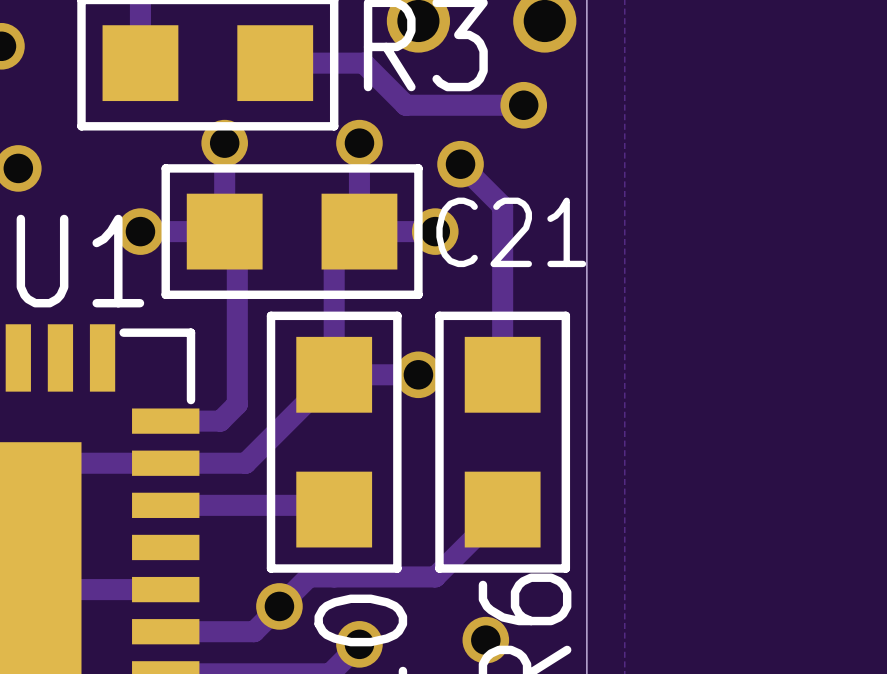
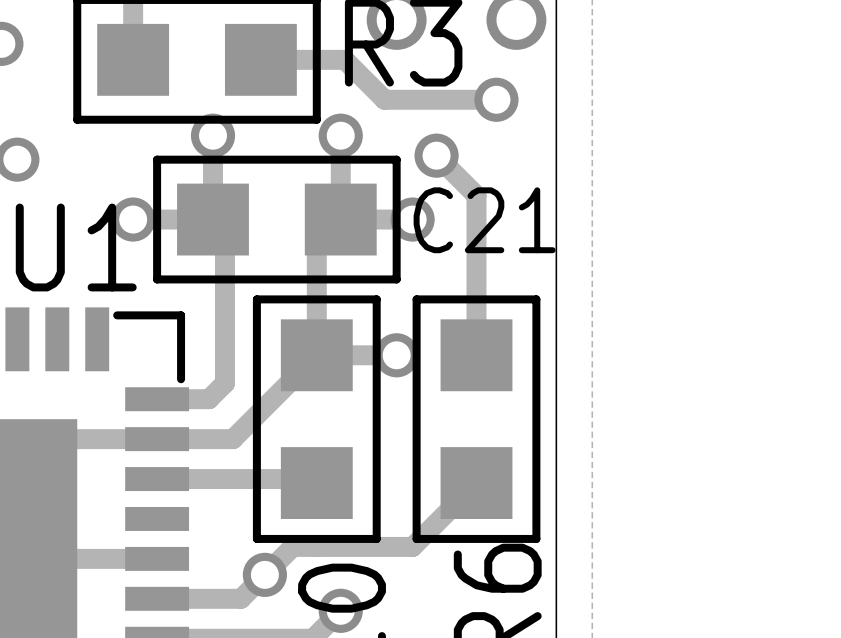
via: (485, 640) -> none

